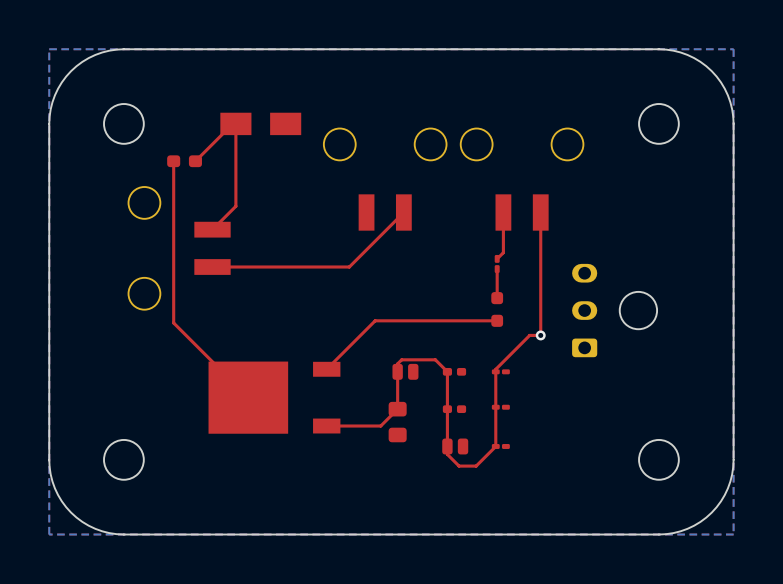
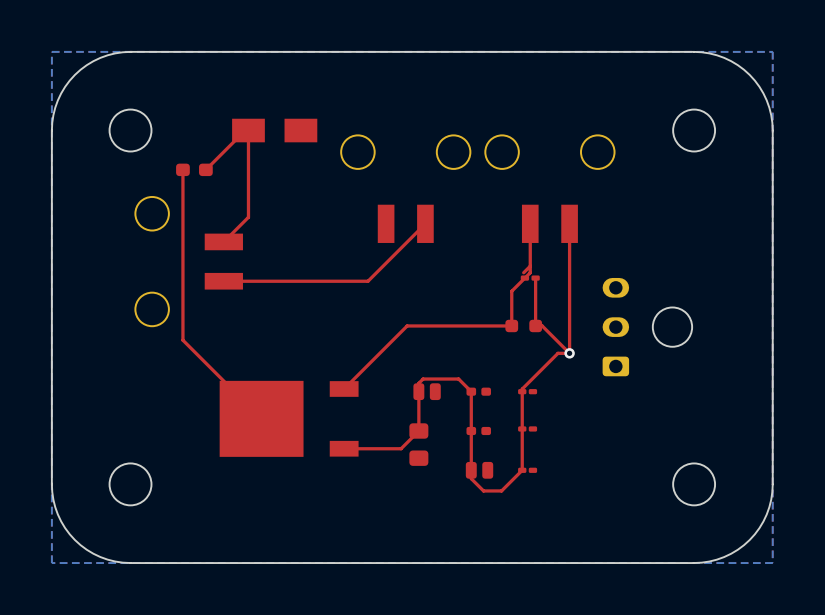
part rotation: 0° (497, 263) -> 90° clockwise (530, 278)
top track: none -> (535, 278) (535, 325) (542, 325) (569, 353)
top track: (497, 269) (497, 298) -> none
part rotation: 0° (497, 309) -> 90° clockwise (523, 325)
top track: (497, 320) (375, 320) -> (530, 266) (530, 272) (511, 291) (511, 325) (407, 325) (395, 337)

